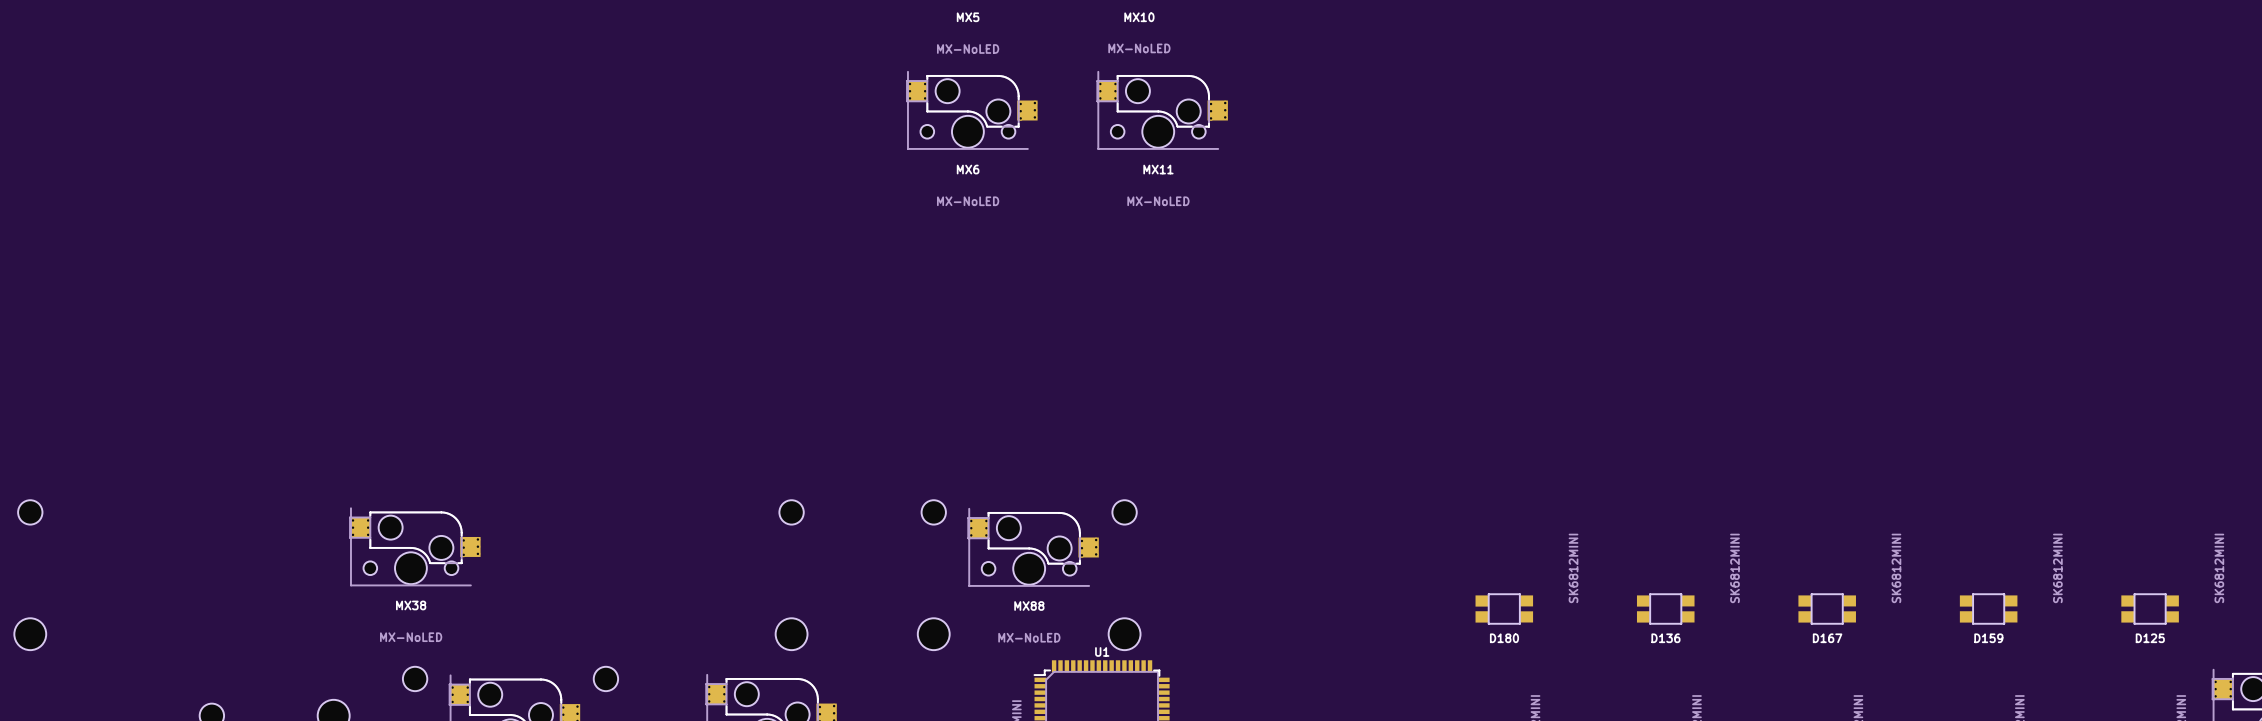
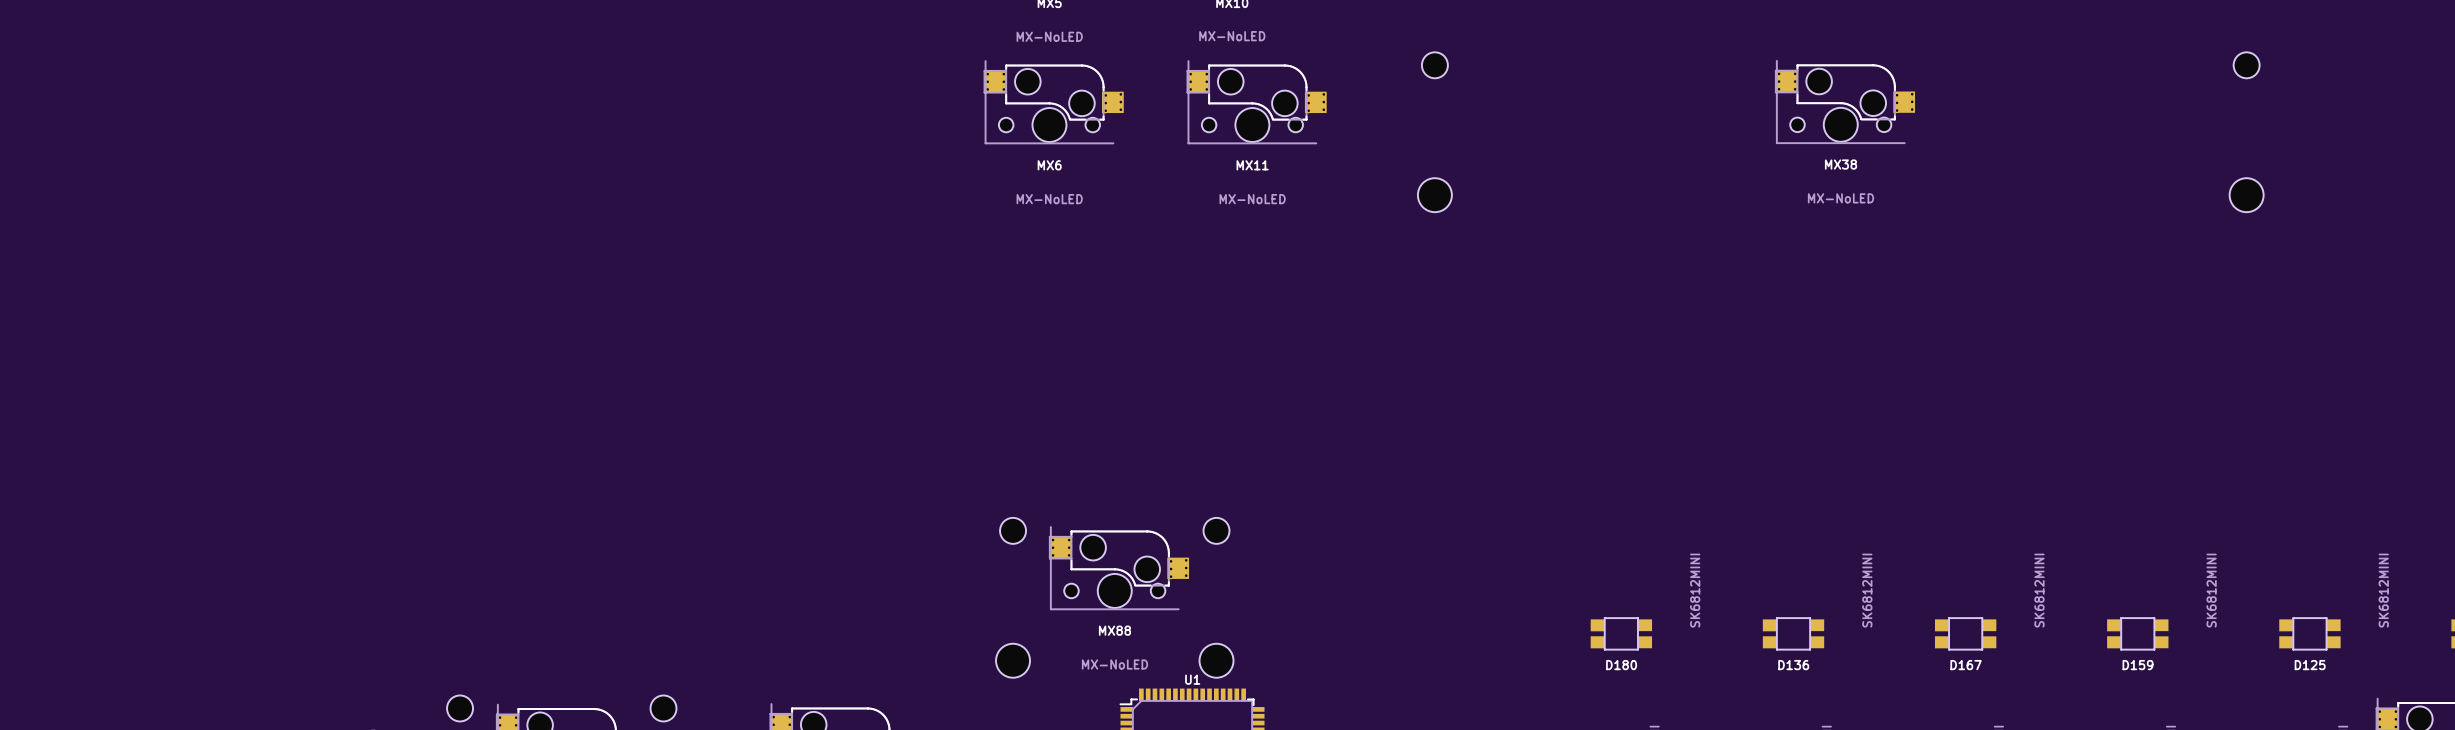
MX38 position: (410, 575) -> (1840, 132)

